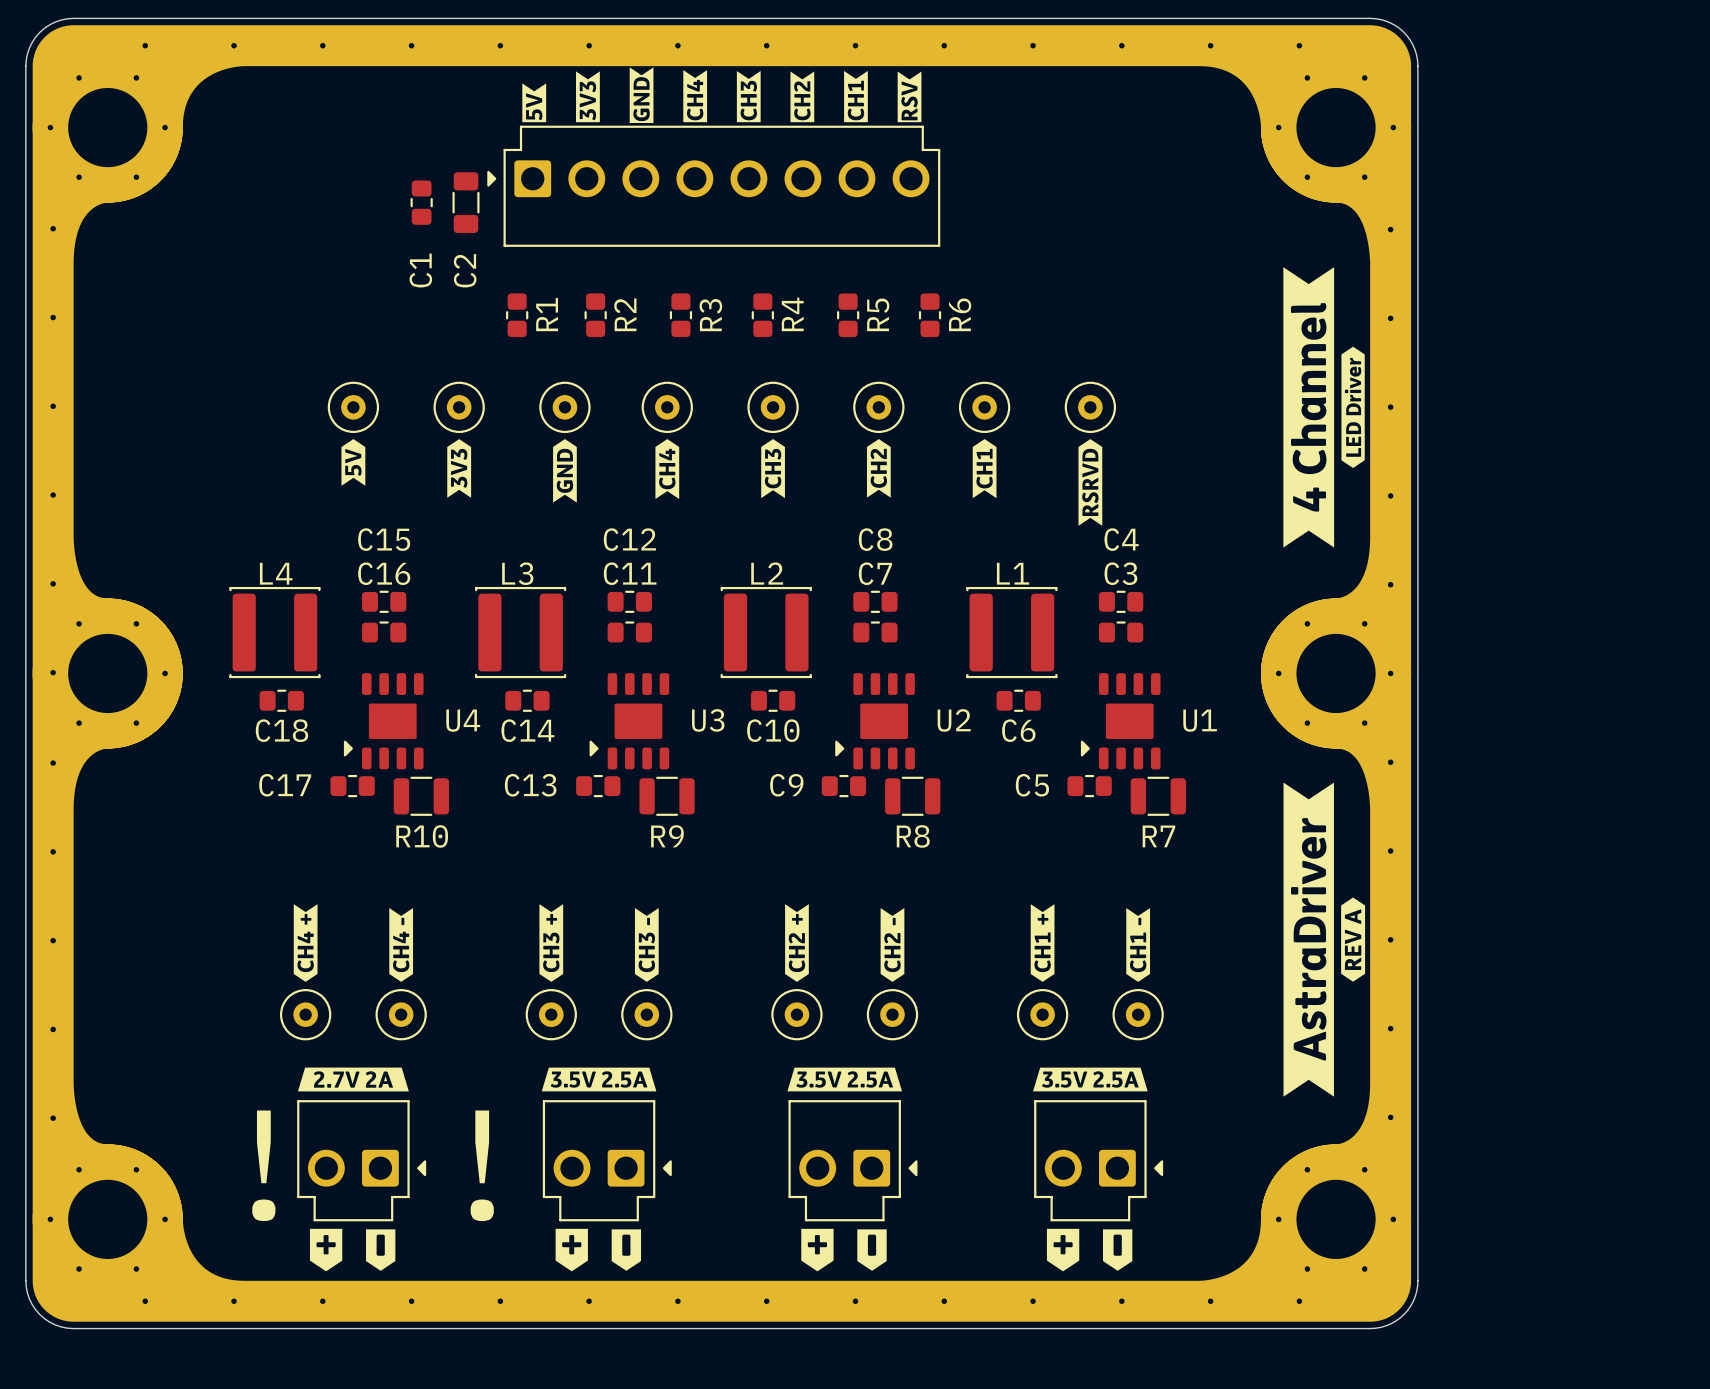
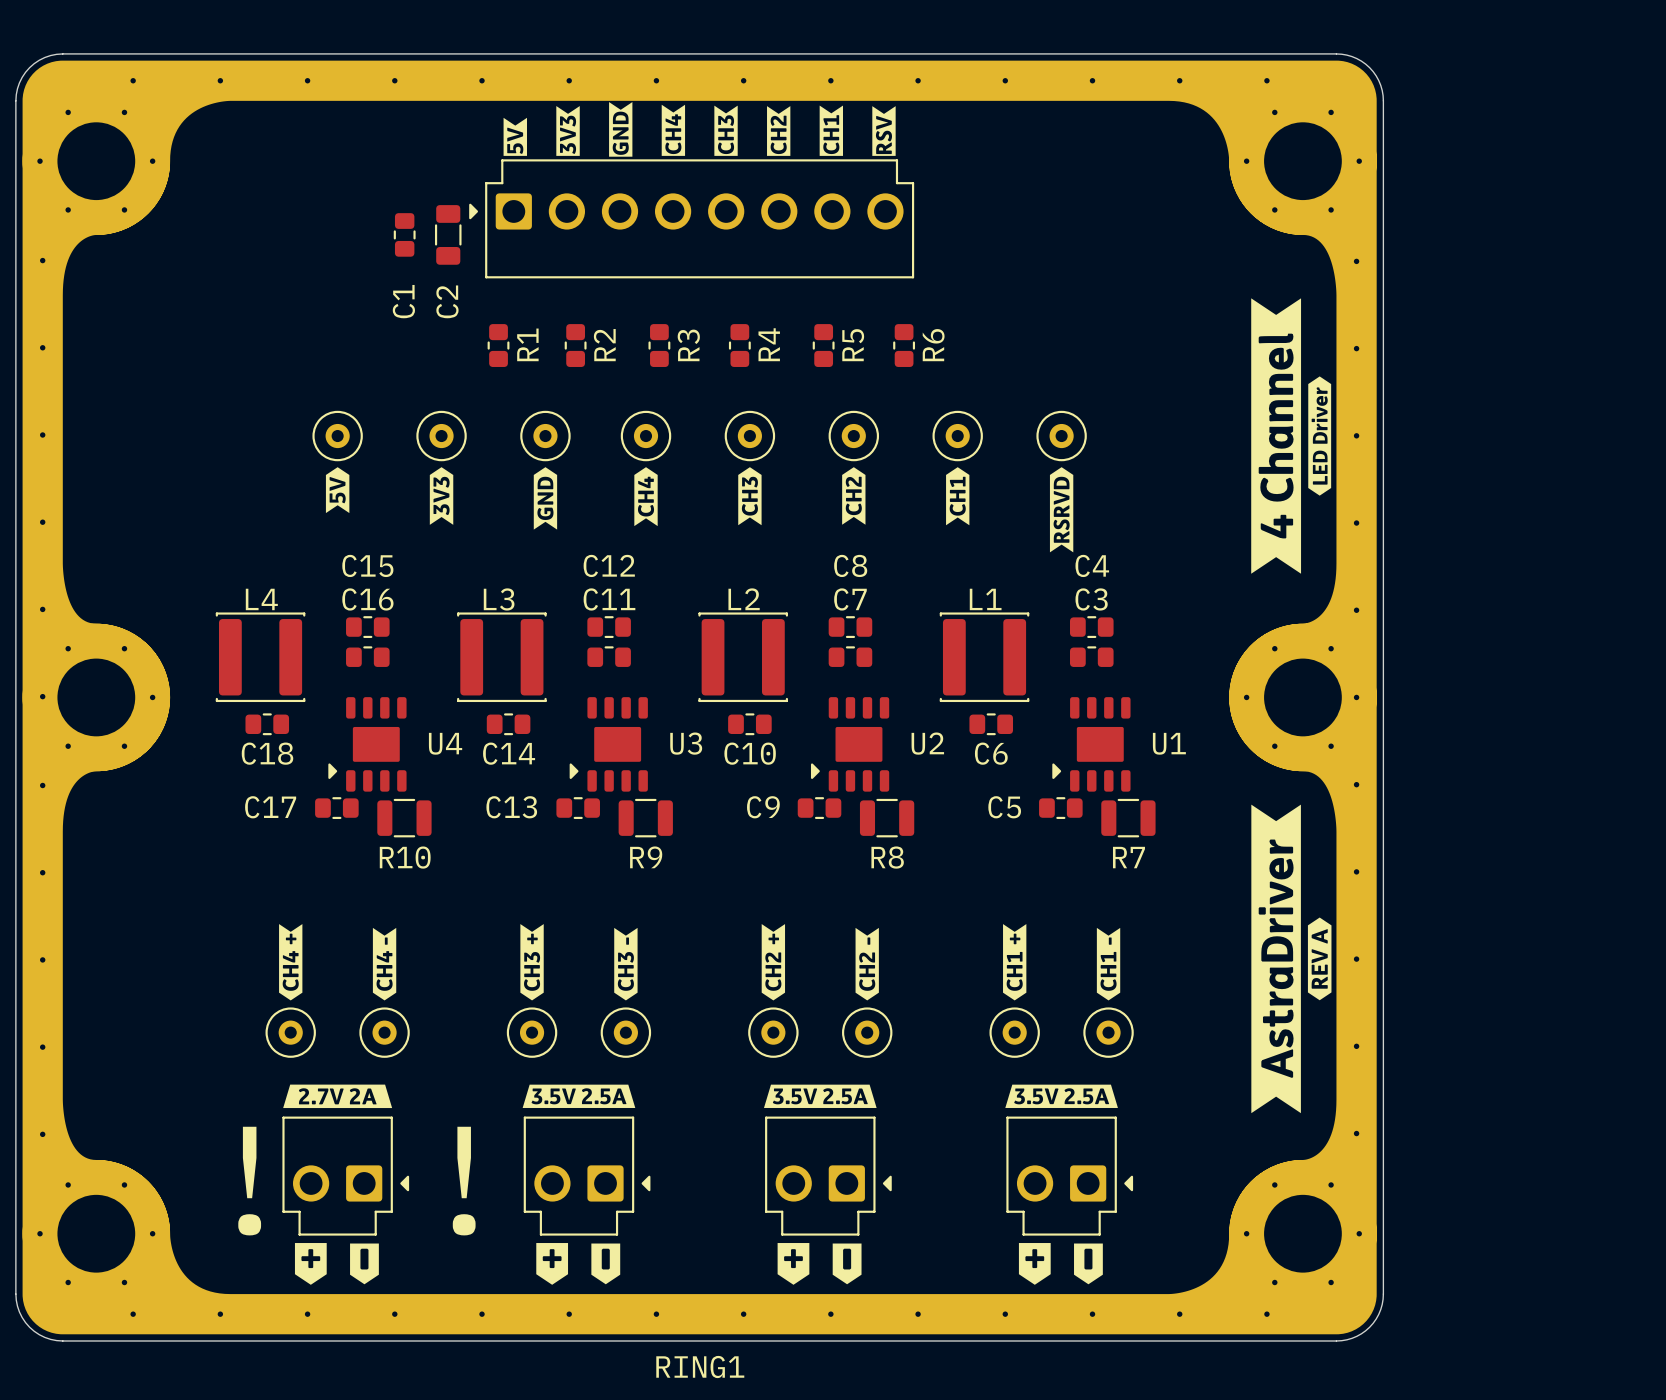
RING1 name: none -> RING1 (700, 1367)

